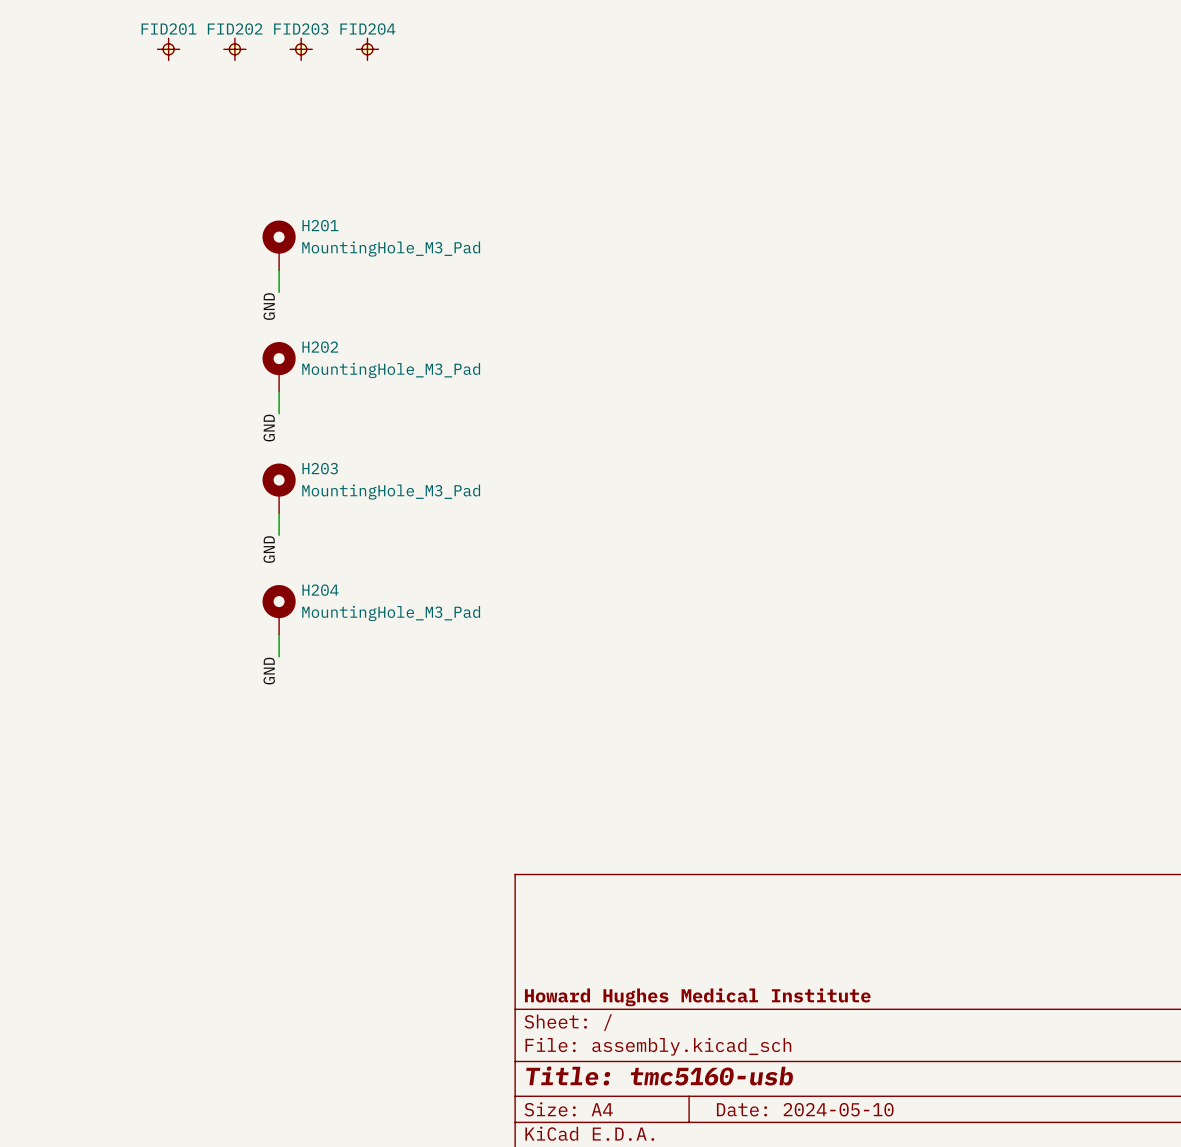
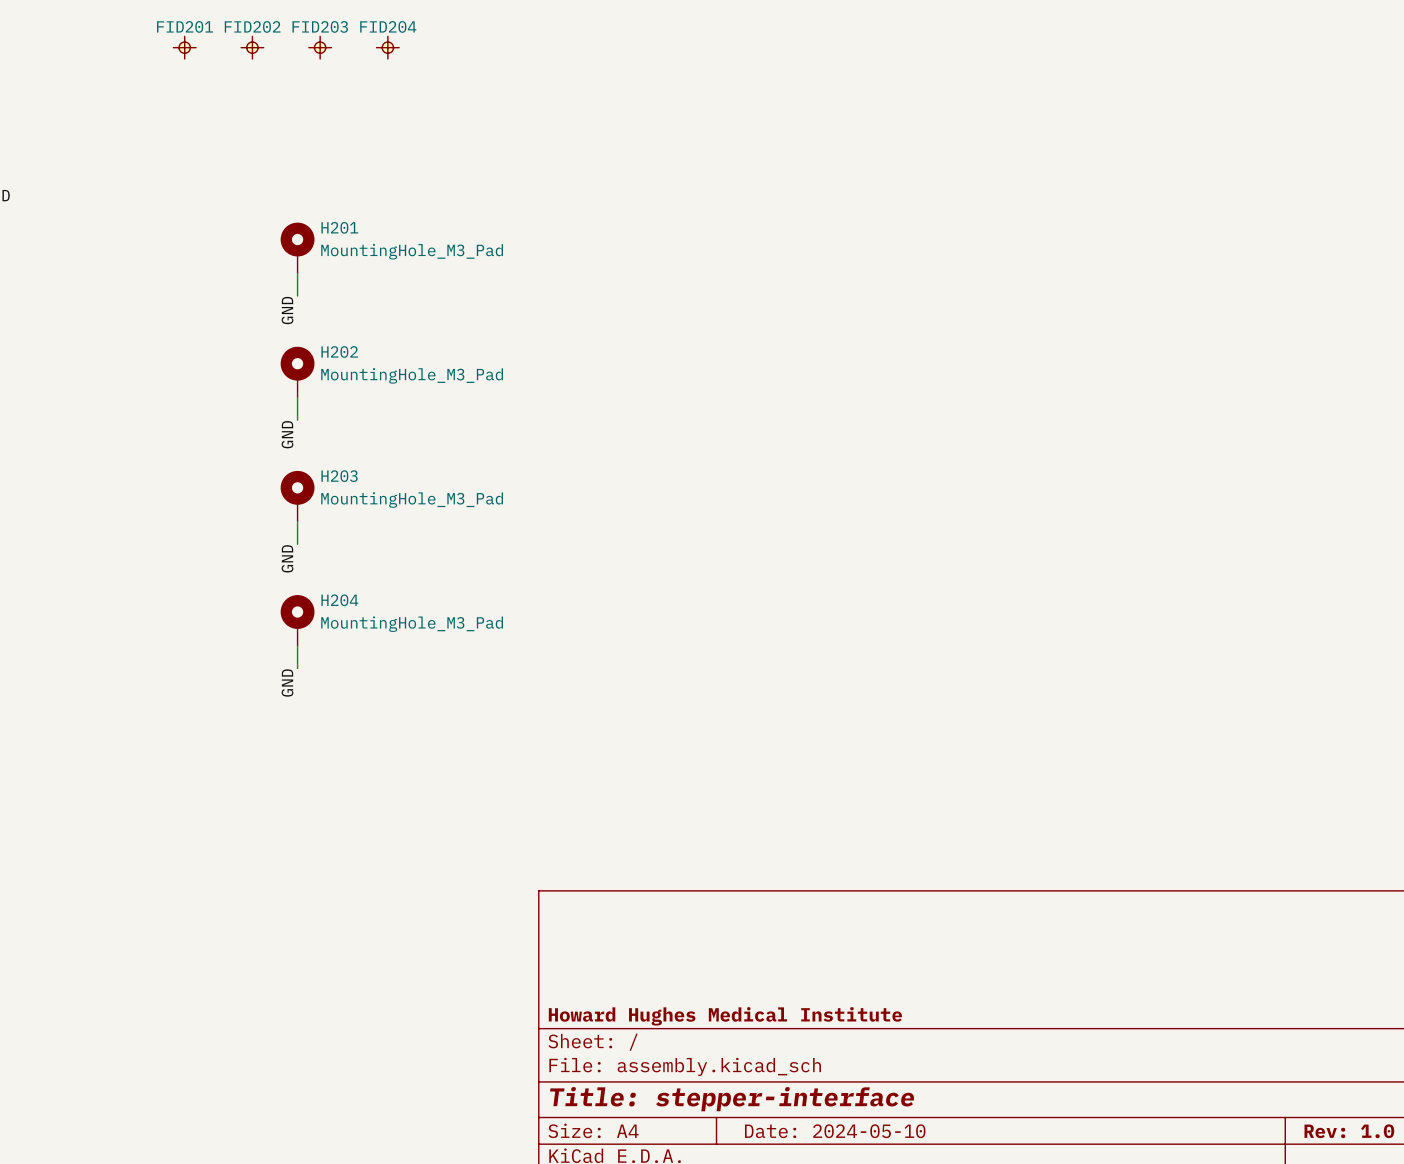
title block: Title: tmc5160-usb (659, 1075) -> Title: stepper-interface (732, 1099)

